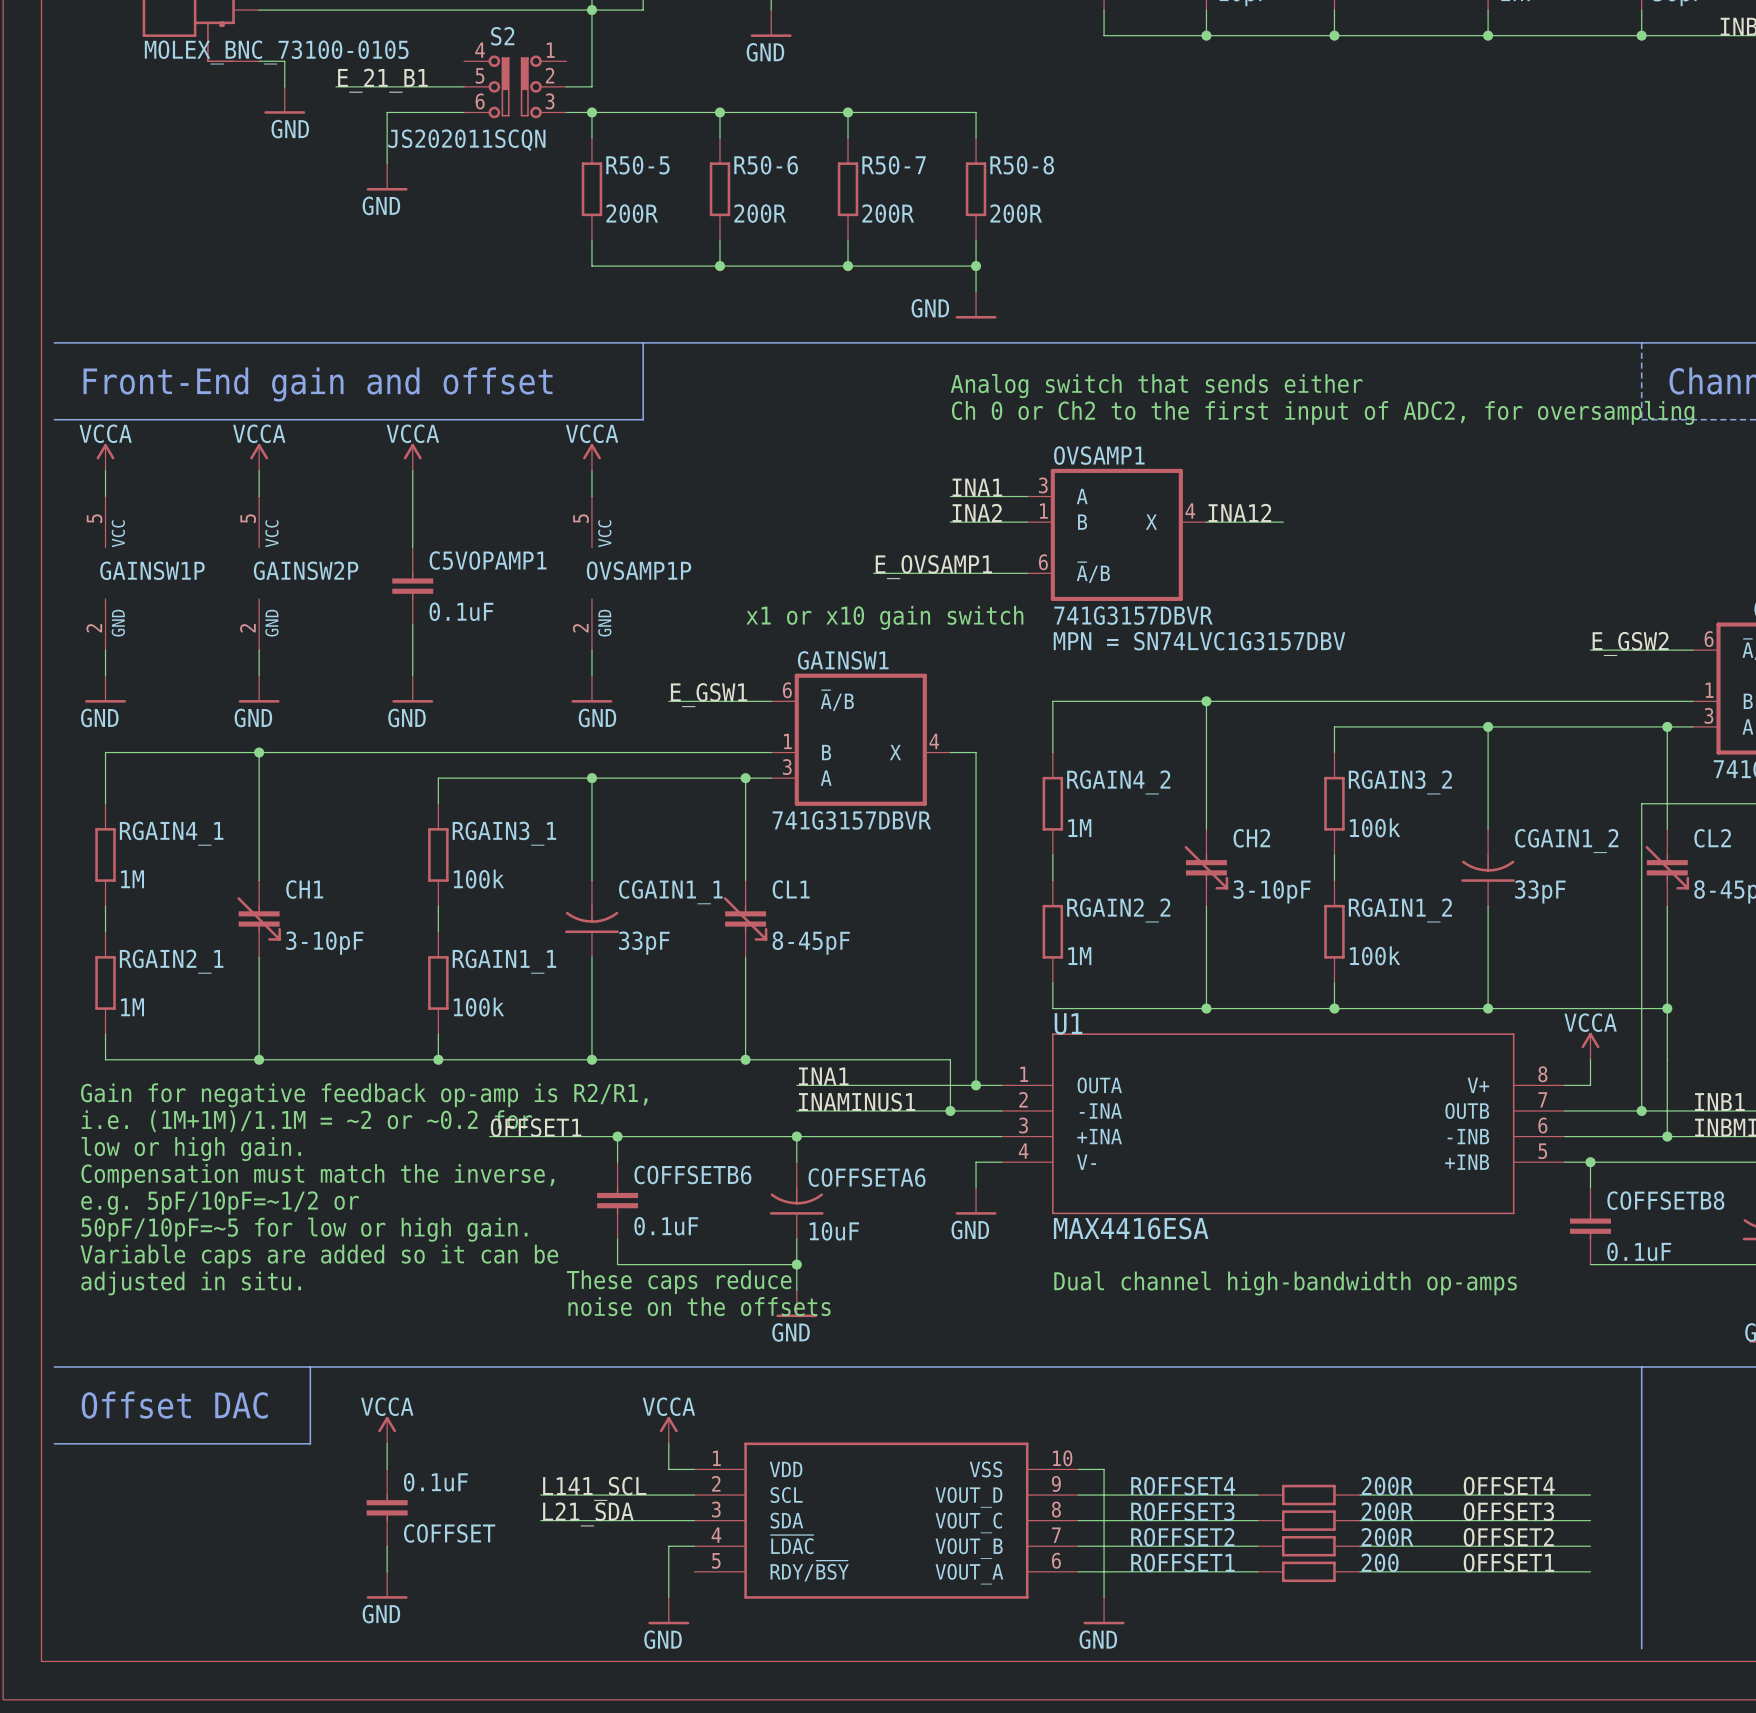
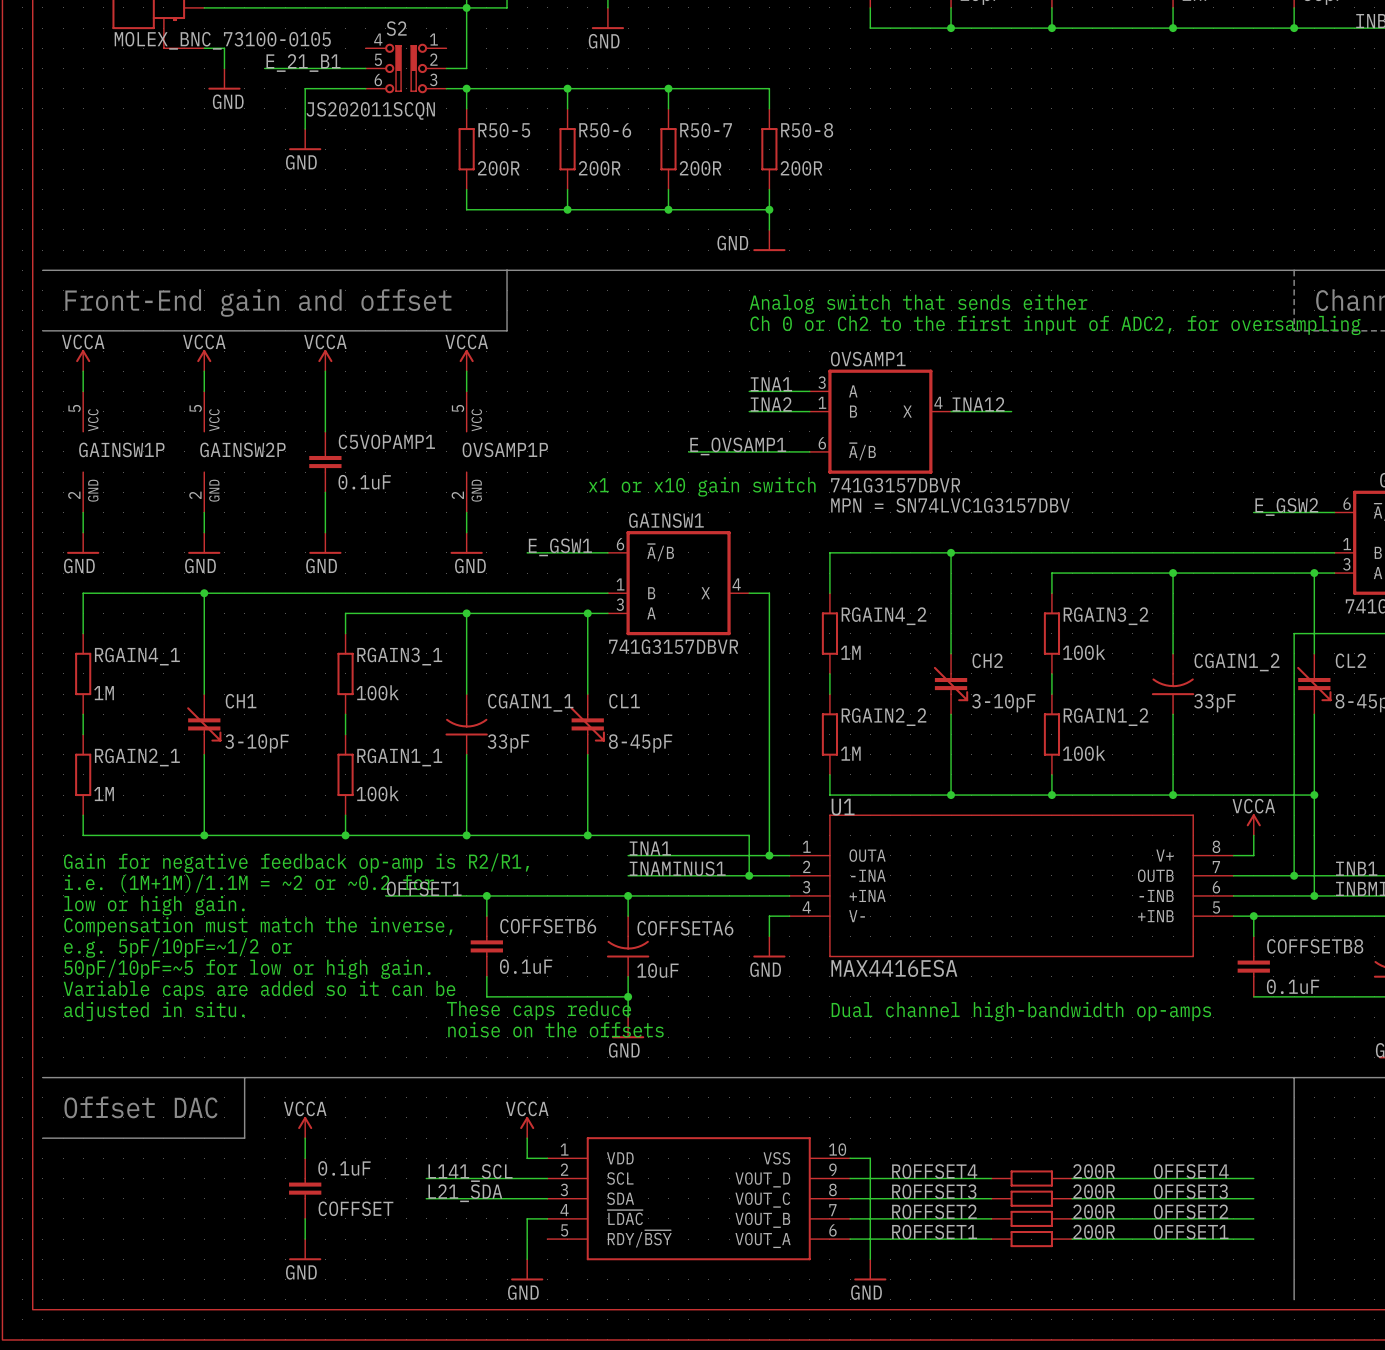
ROFFSET1 value: 200 (1380, 1562) -> 200R (1094, 1232)

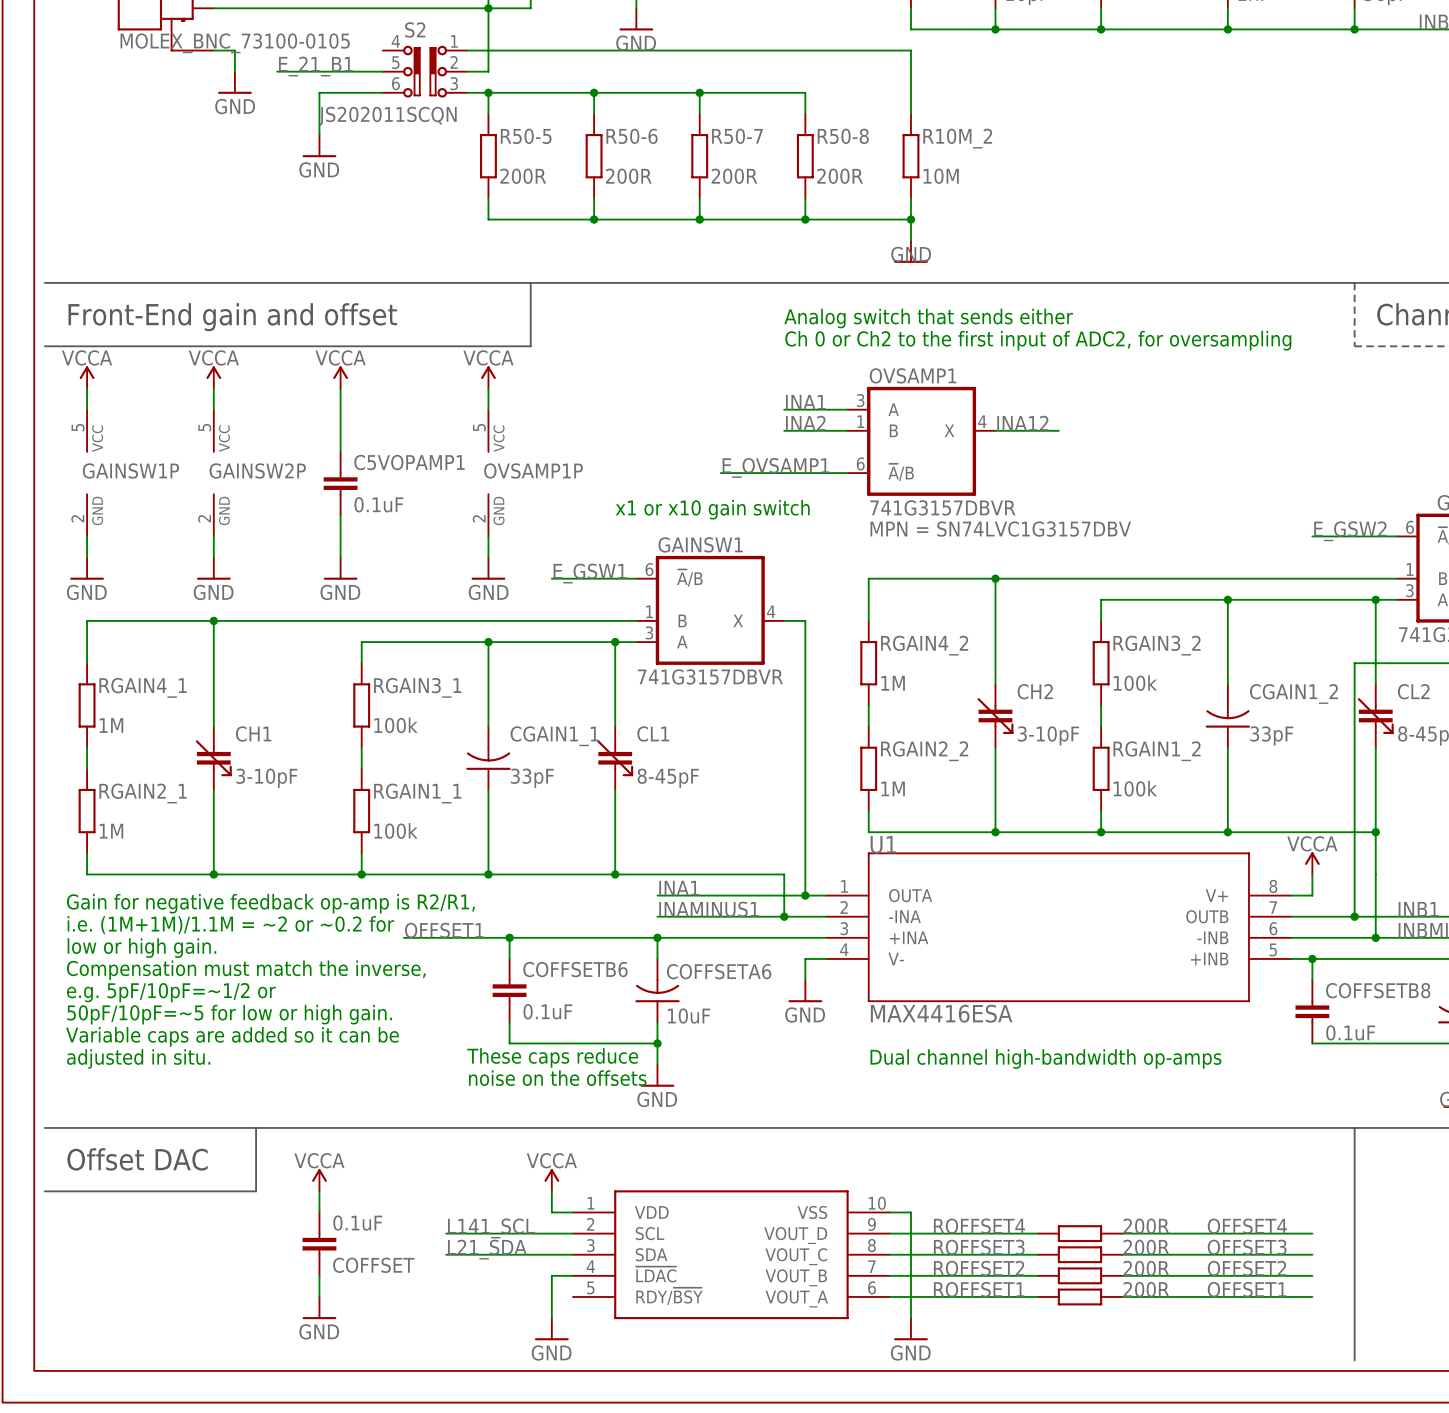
wire: none -> (467, 50) (910, 50) (910, 113)
R10M_2: none -> 10M (910, 156)
wire: none -> (910, 198) (910, 240)
wire: (769, 209) (769, 229) -> (805, 219) (910, 219)
junction: none -> (910, 219)
power symbol position: GND (769, 240) -> GND (910, 251)
power symbol text position: GND (732, 243) -> GND (911, 254)

